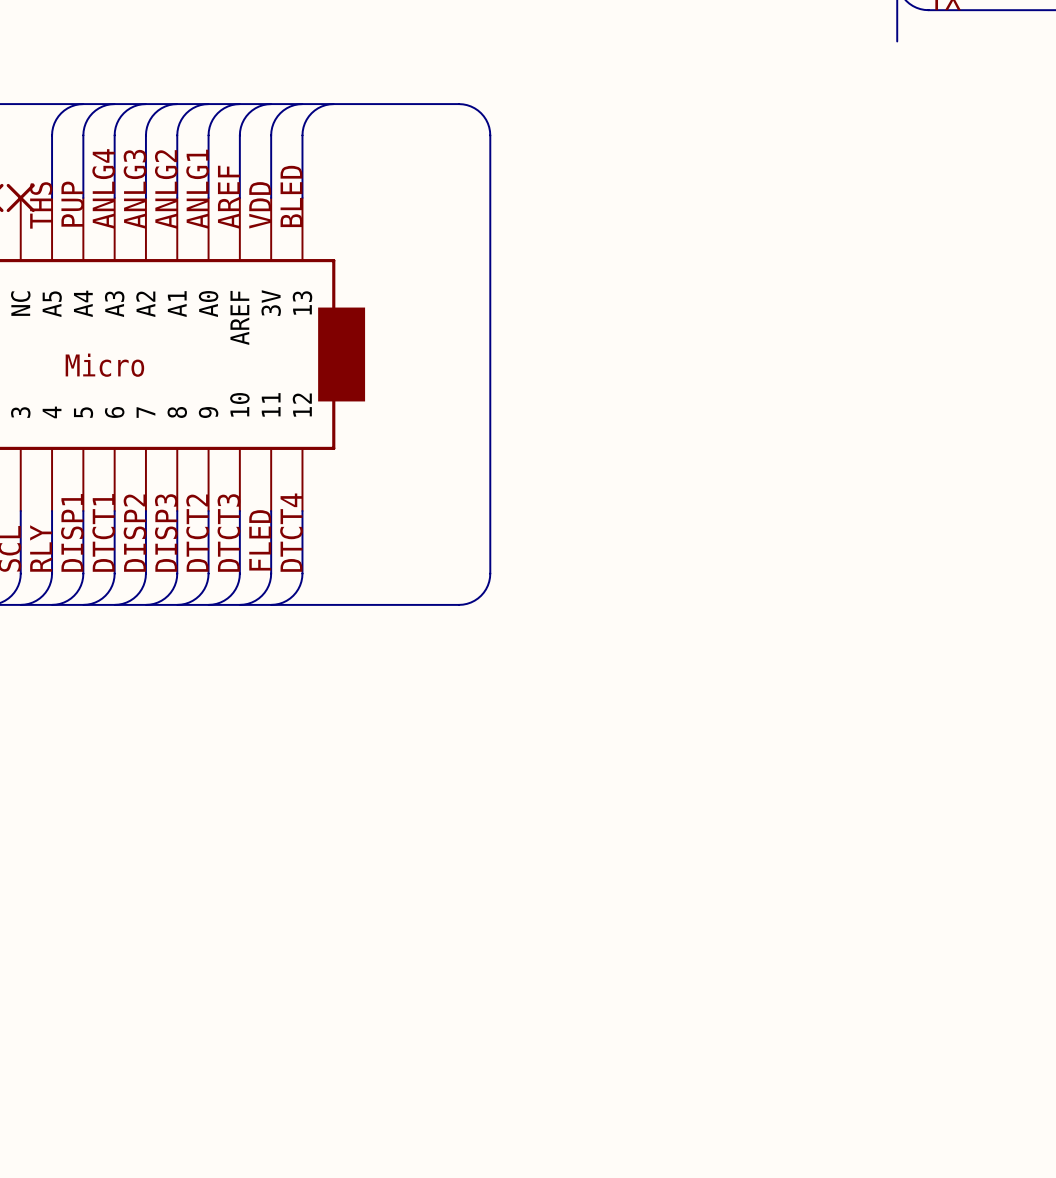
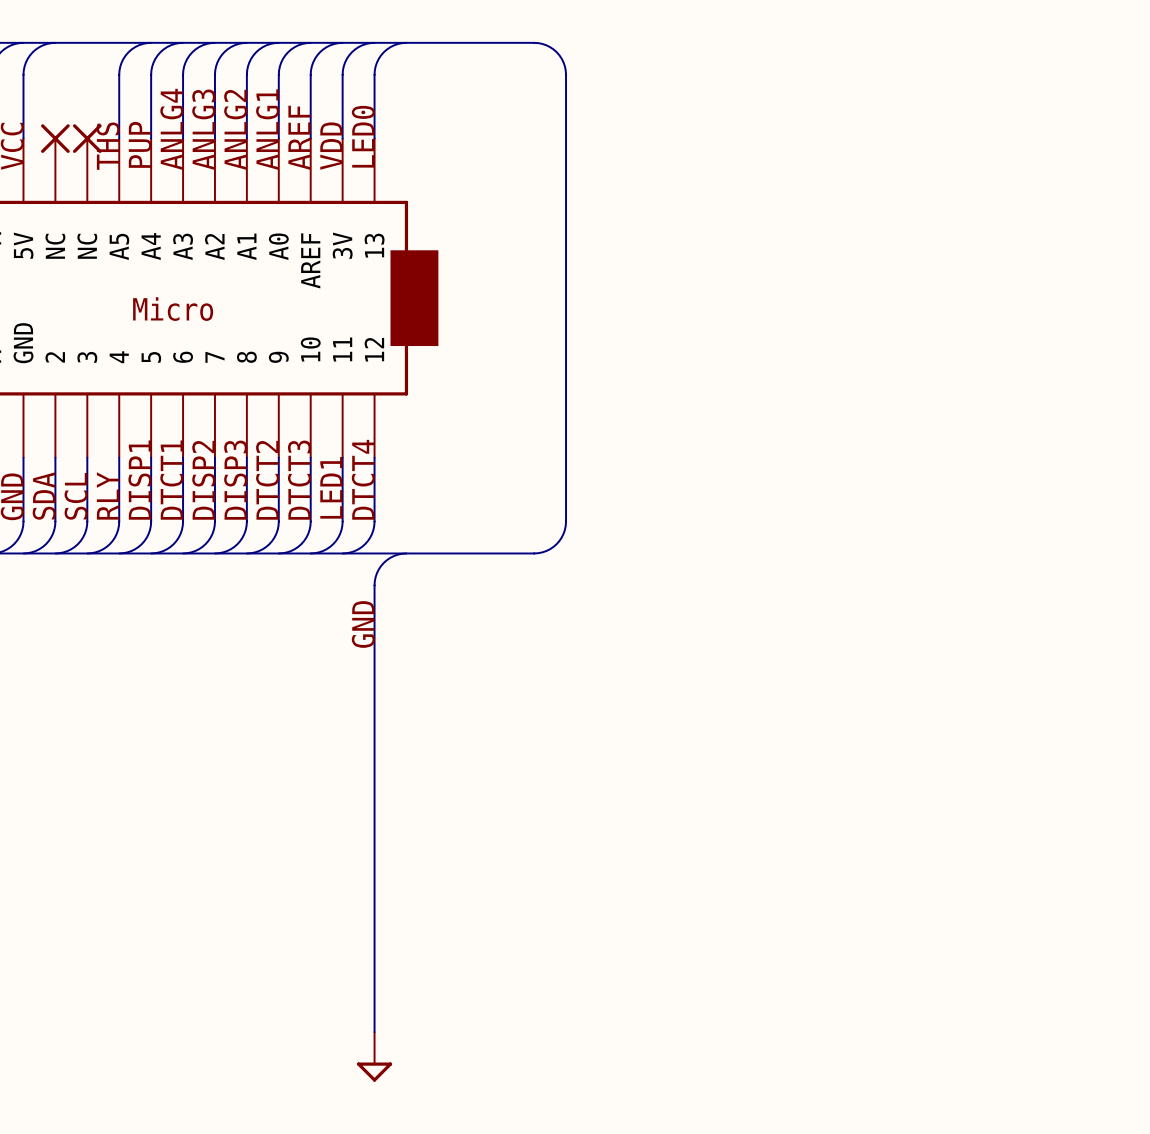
label: BLED (291, 196) -> LED0 (363, 136)
label: FLED (260, 540) -> LED1 (331, 487)
wire: none -> (406, 553) (394, 555) (383, 562) (376, 573) (374, 581) (374, 1032)
label: none -> GND (363, 624)
power symbol: none -> (374, 1056)

